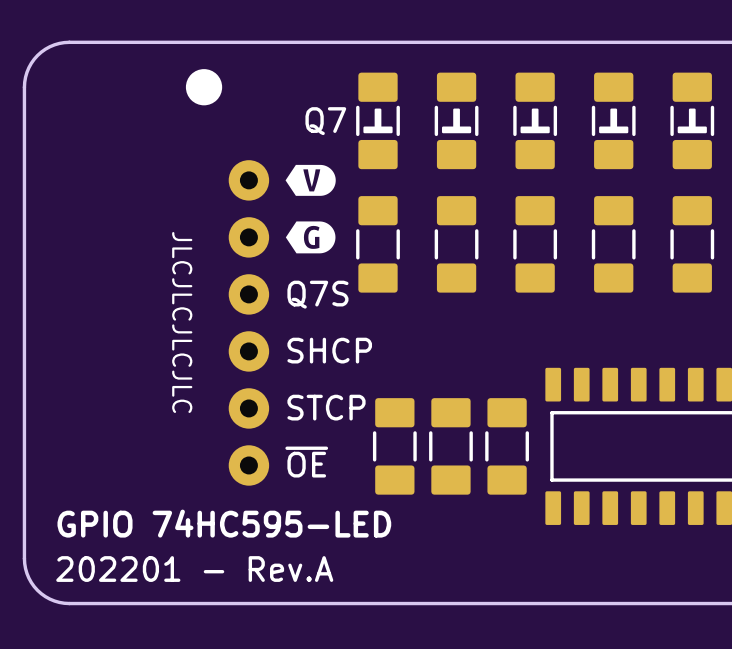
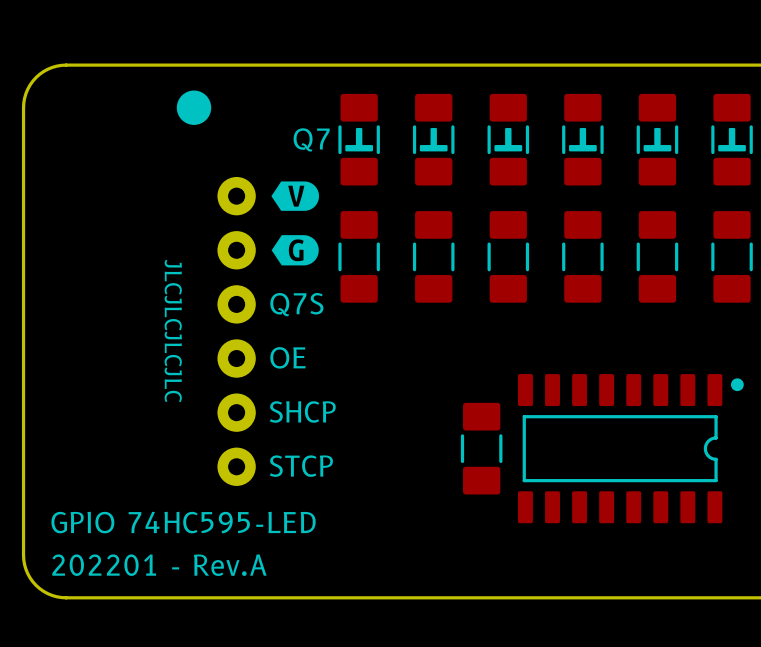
text: SHCP (329, 350) -> OE (287, 357)
text: STCP (326, 407) -> SHCP (302, 411)
part: (394, 446) -> none
part: (450, 446) -> none
text: ~{OE} (306, 462) -> STCP (301, 466)

